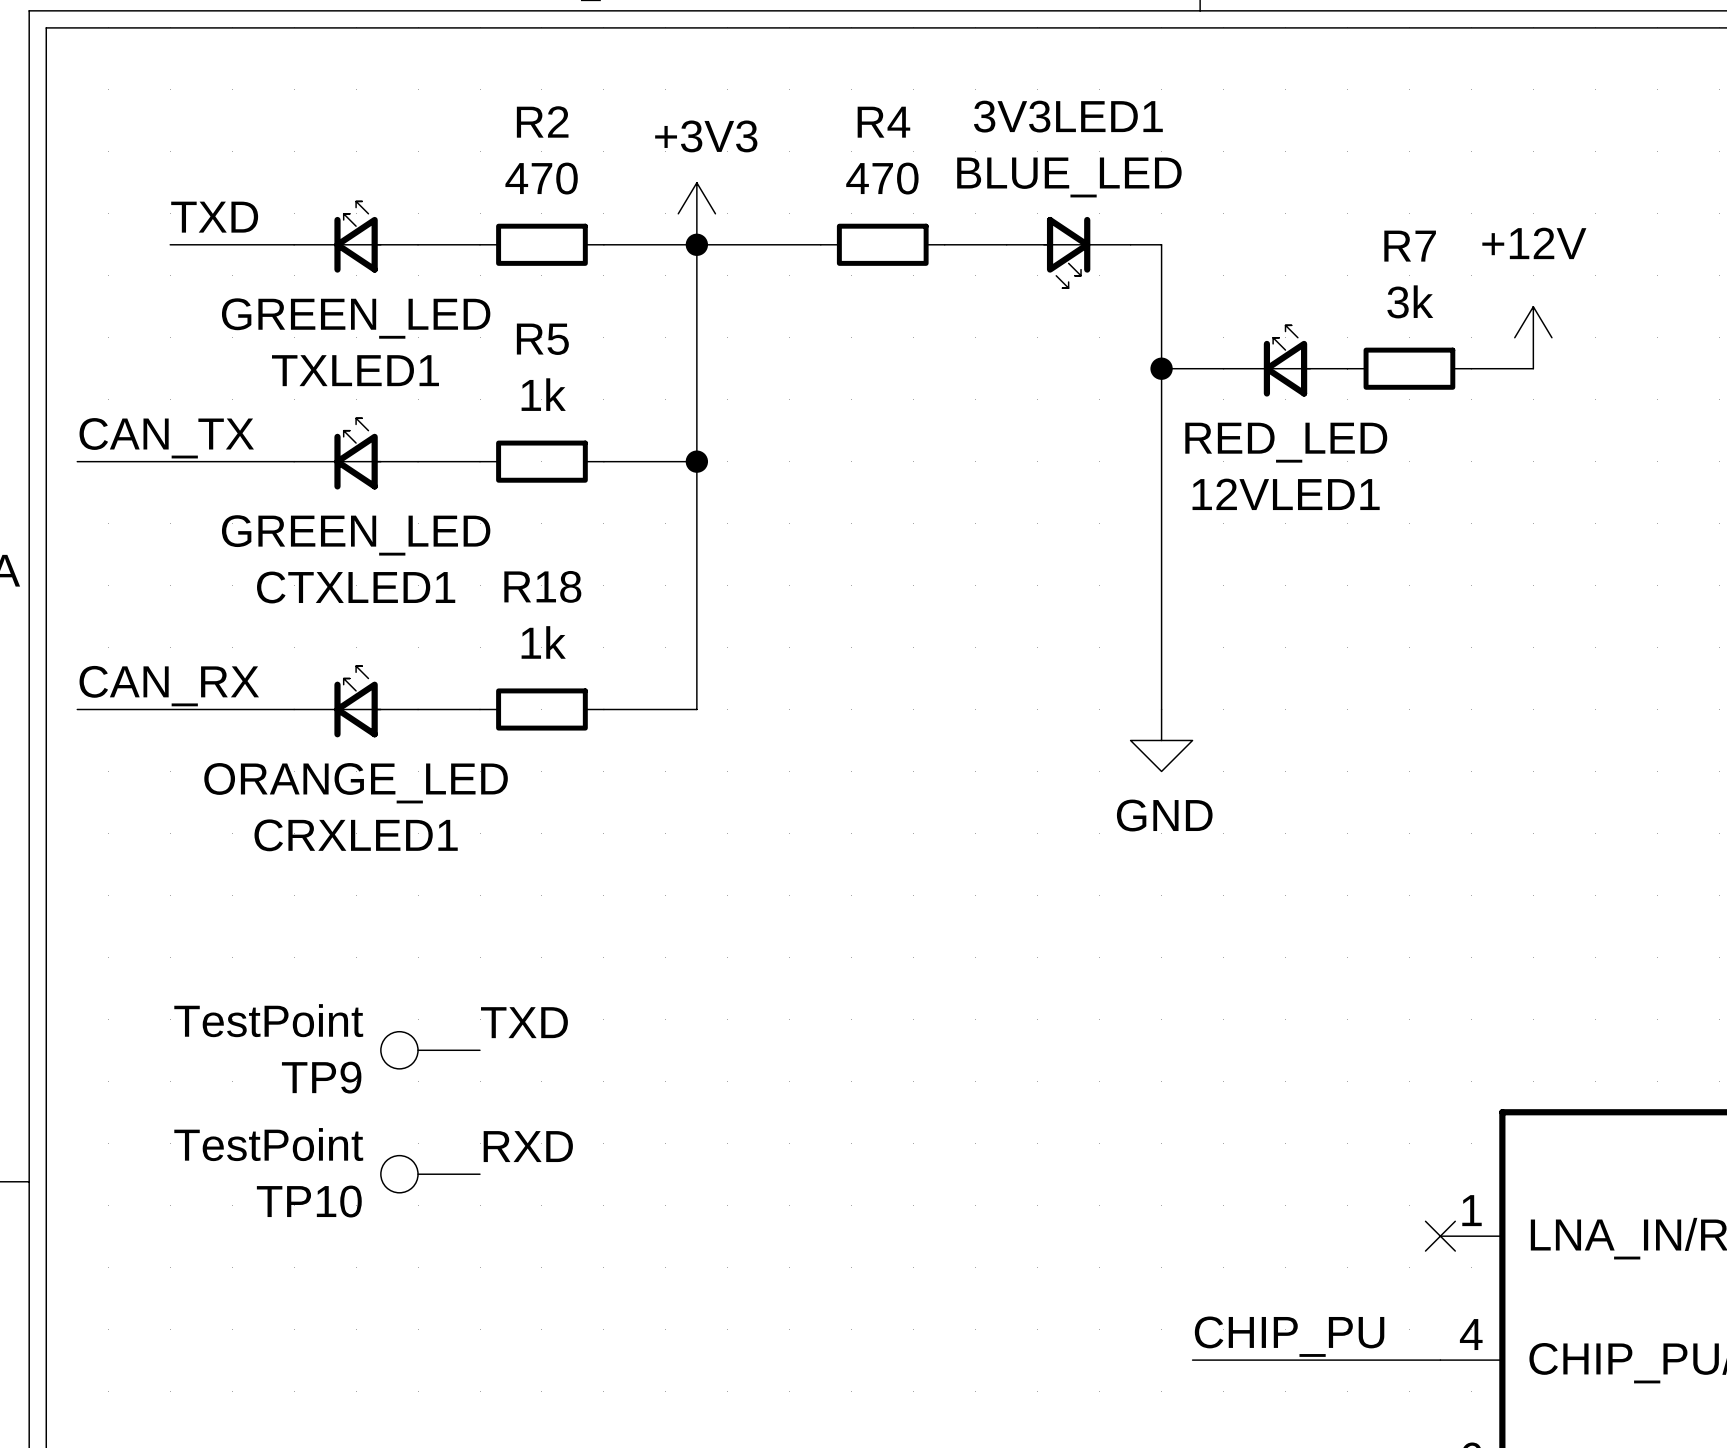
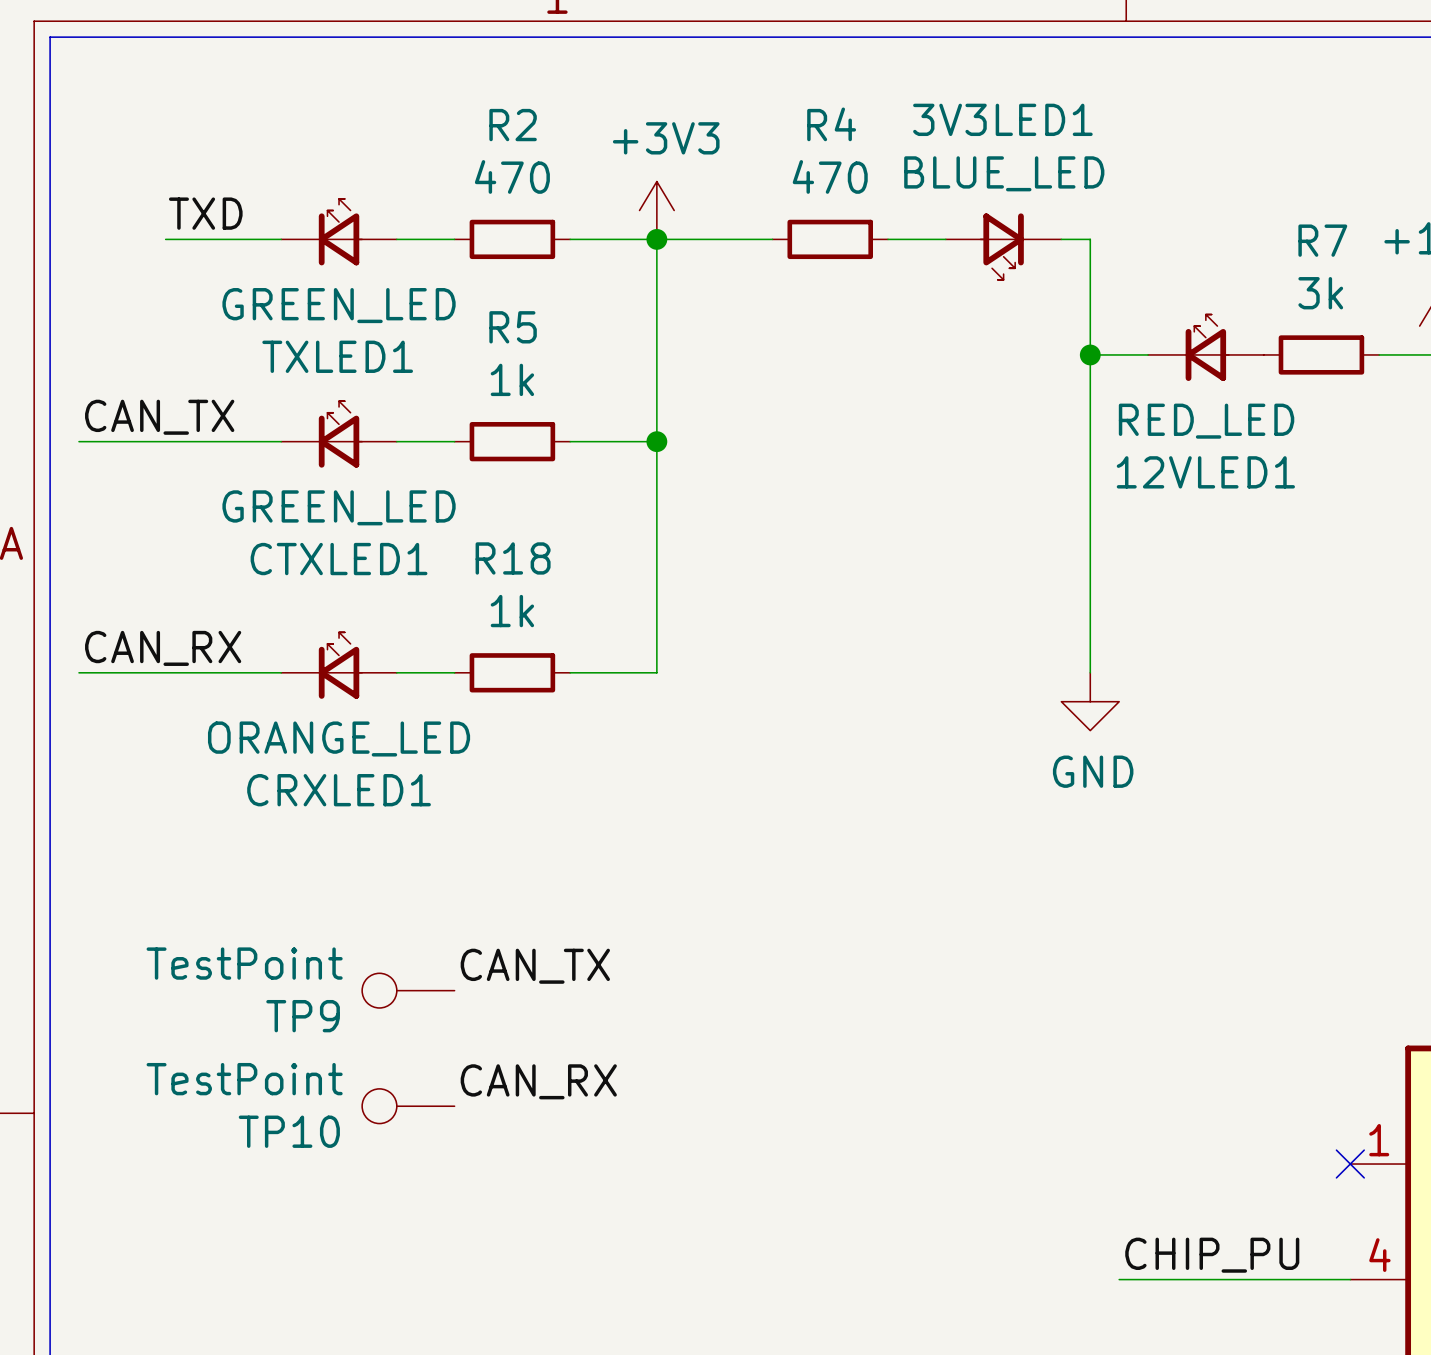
label: TXD (524, 1022) -> CAN_TX (535, 966)
label: RXD (528, 1146) -> CAN_RX (538, 1081)

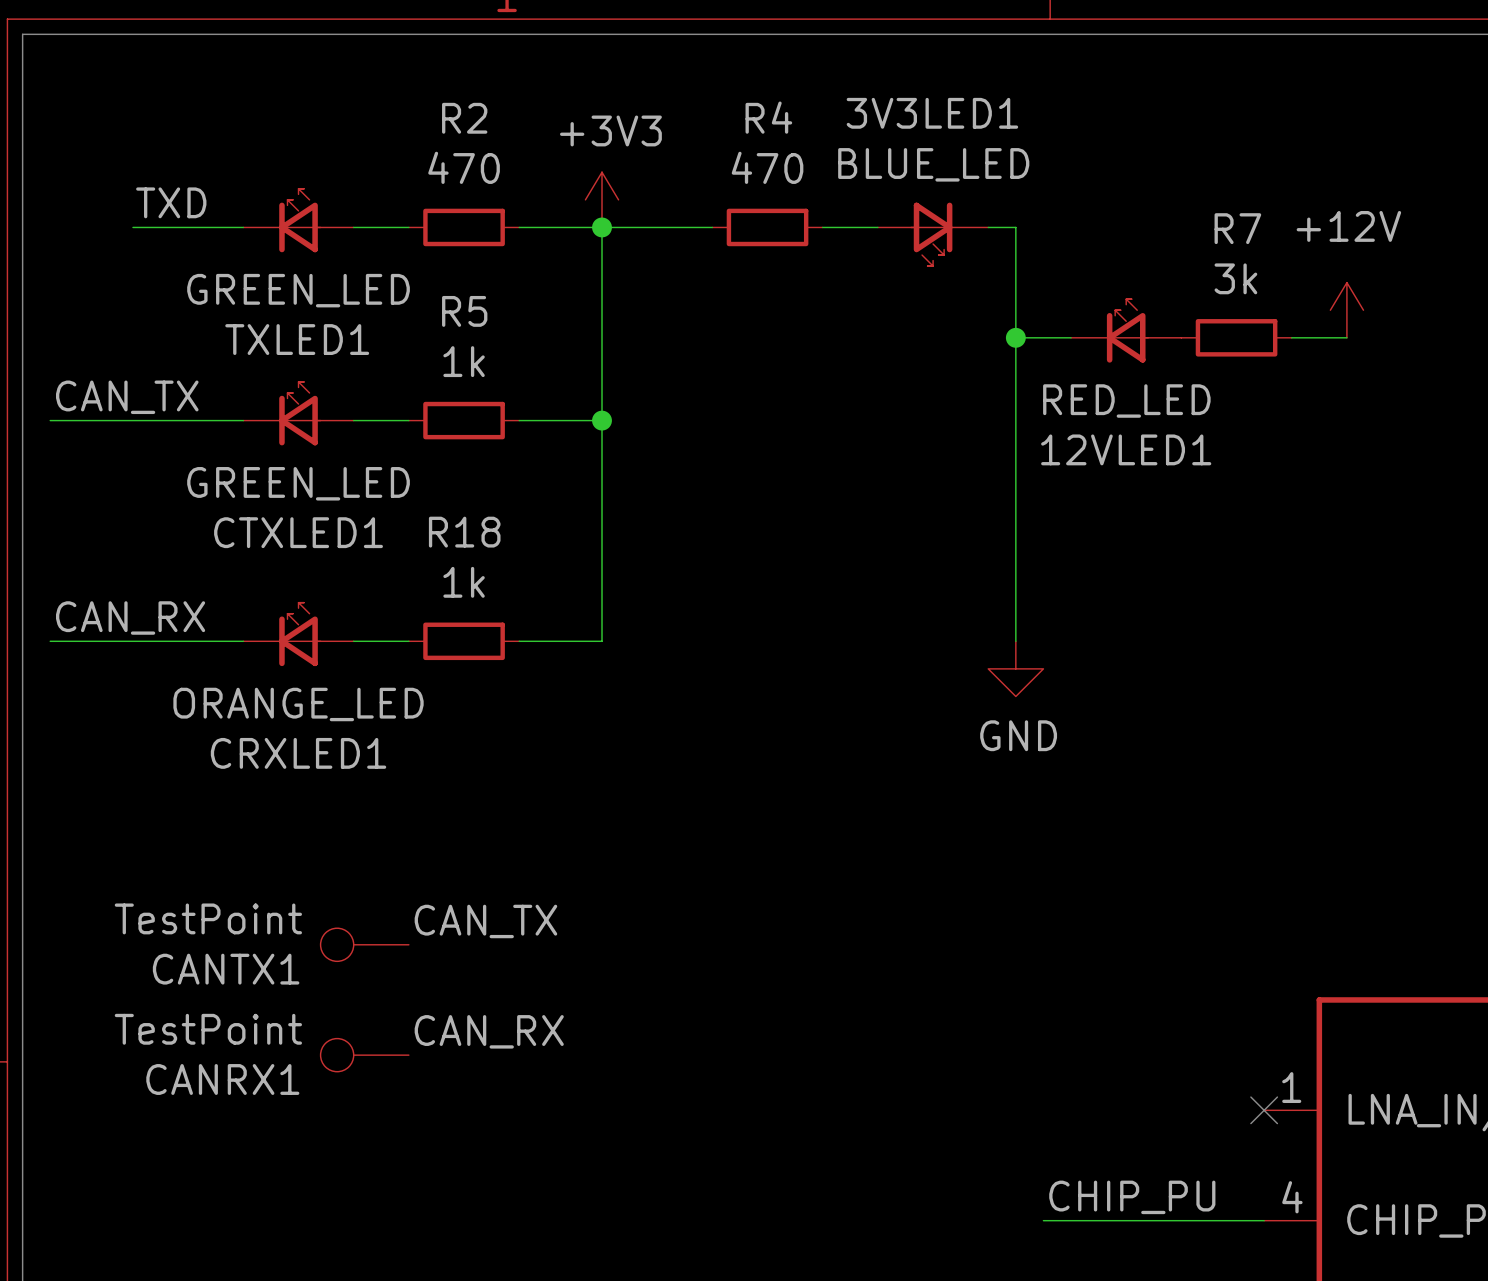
TP9 name: TP9 (303, 1016) -> CANTX1 (226, 969)
TP10 name: TP10 (289, 1131) -> CANRX1 (222, 1079)

